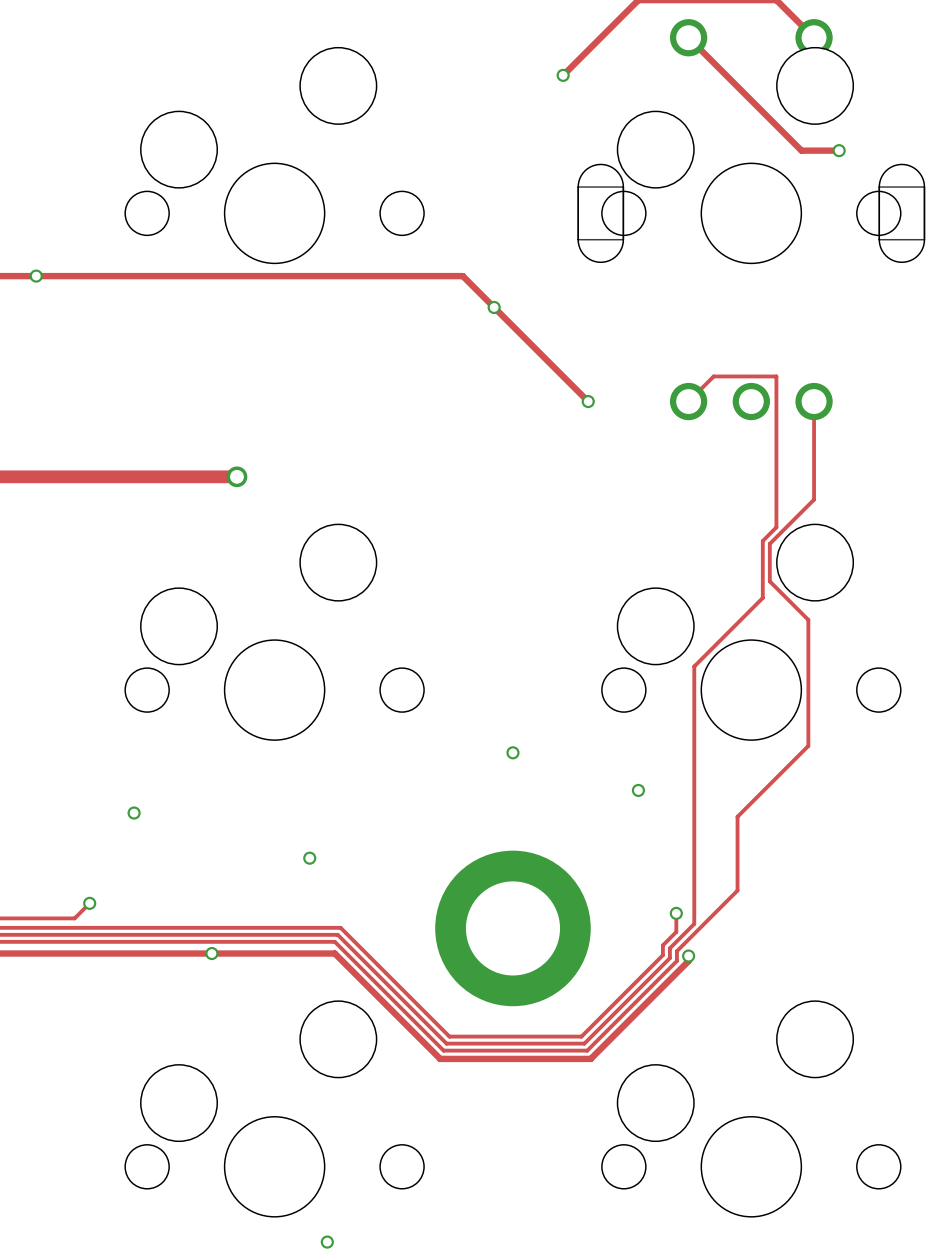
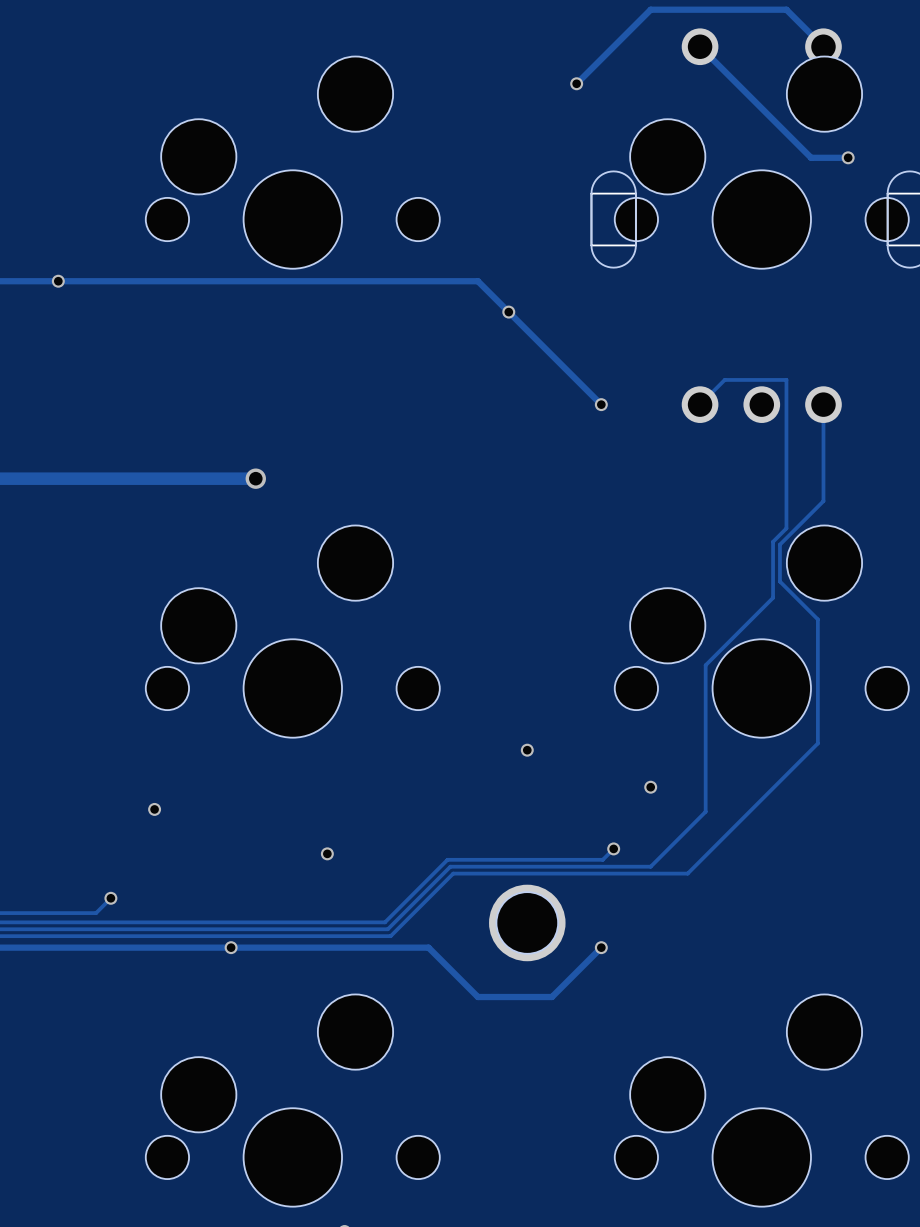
track: (694, 815) (694, 923) (669, 948) (669, 958) (584, 1043) (446, 1043) (337, 934) -> (705, 811) (650, 866) (450, 866) (387, 929) (354, 929)
track: (737, 816) (737, 890) (676, 951) (676, 961) (587, 1050) (443, 1050) (334, 941) -> (748, 813) (687, 873) (453, 873) (390, 936) (352, 936)
part footprint: [435, 850, 591, 1007] -> [489, 884, 566, 962]
via: none -> (613, 848)
track: (676, 913) (676, 931) (662, 945) (662, 955) (581, 1036) (449, 1036) (340, 927) -> (613, 848) (602, 859) (447, 859) (384, 922) (357, 922)
via: (676, 913) -> none
track: (334, 953) (440, 1058) (590, 1058) (688, 961) (688, 956) -> (352, 947) (428, 947) (477, 997) (551, 997) (601, 947)
via: none -> (601, 947)
via: (688, 956) -> none

